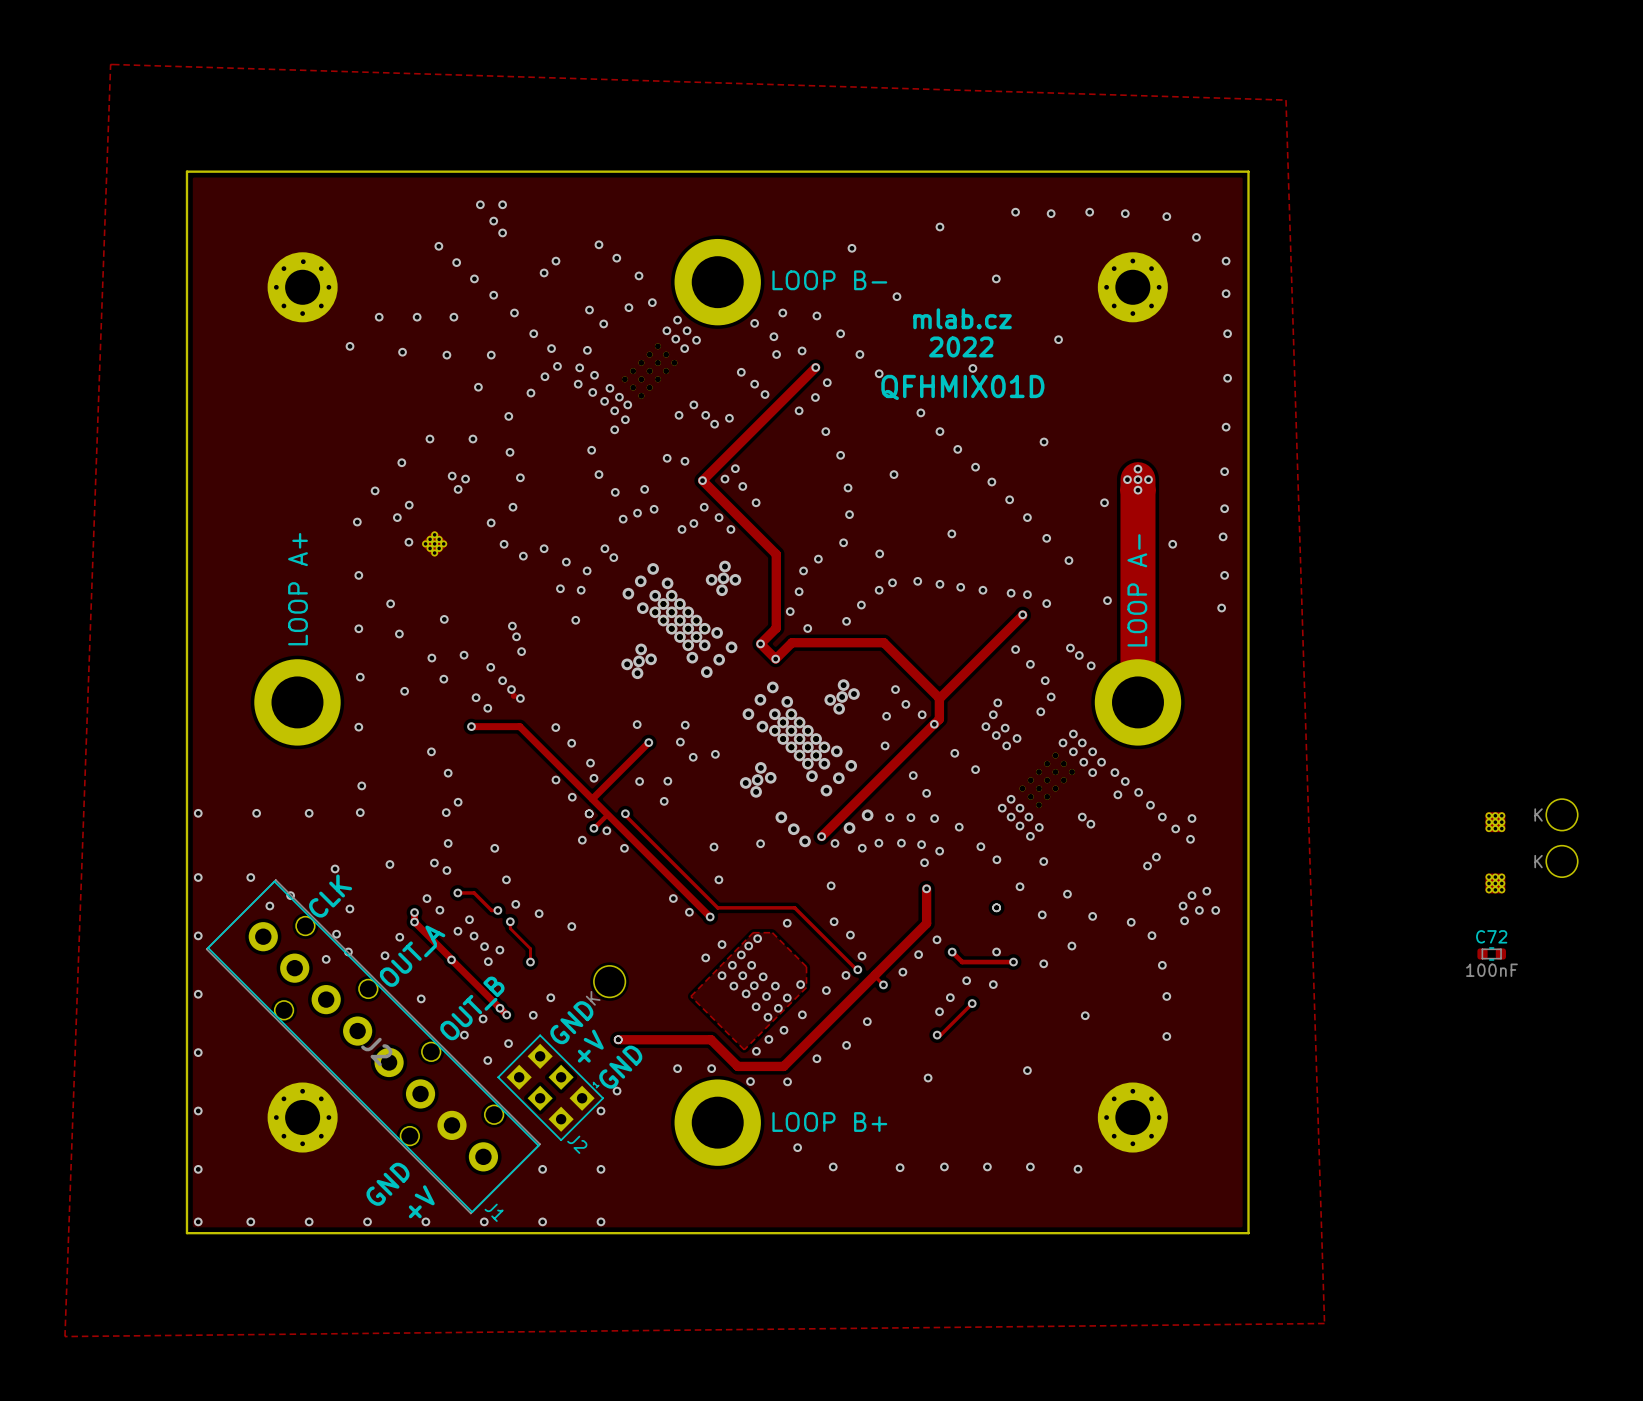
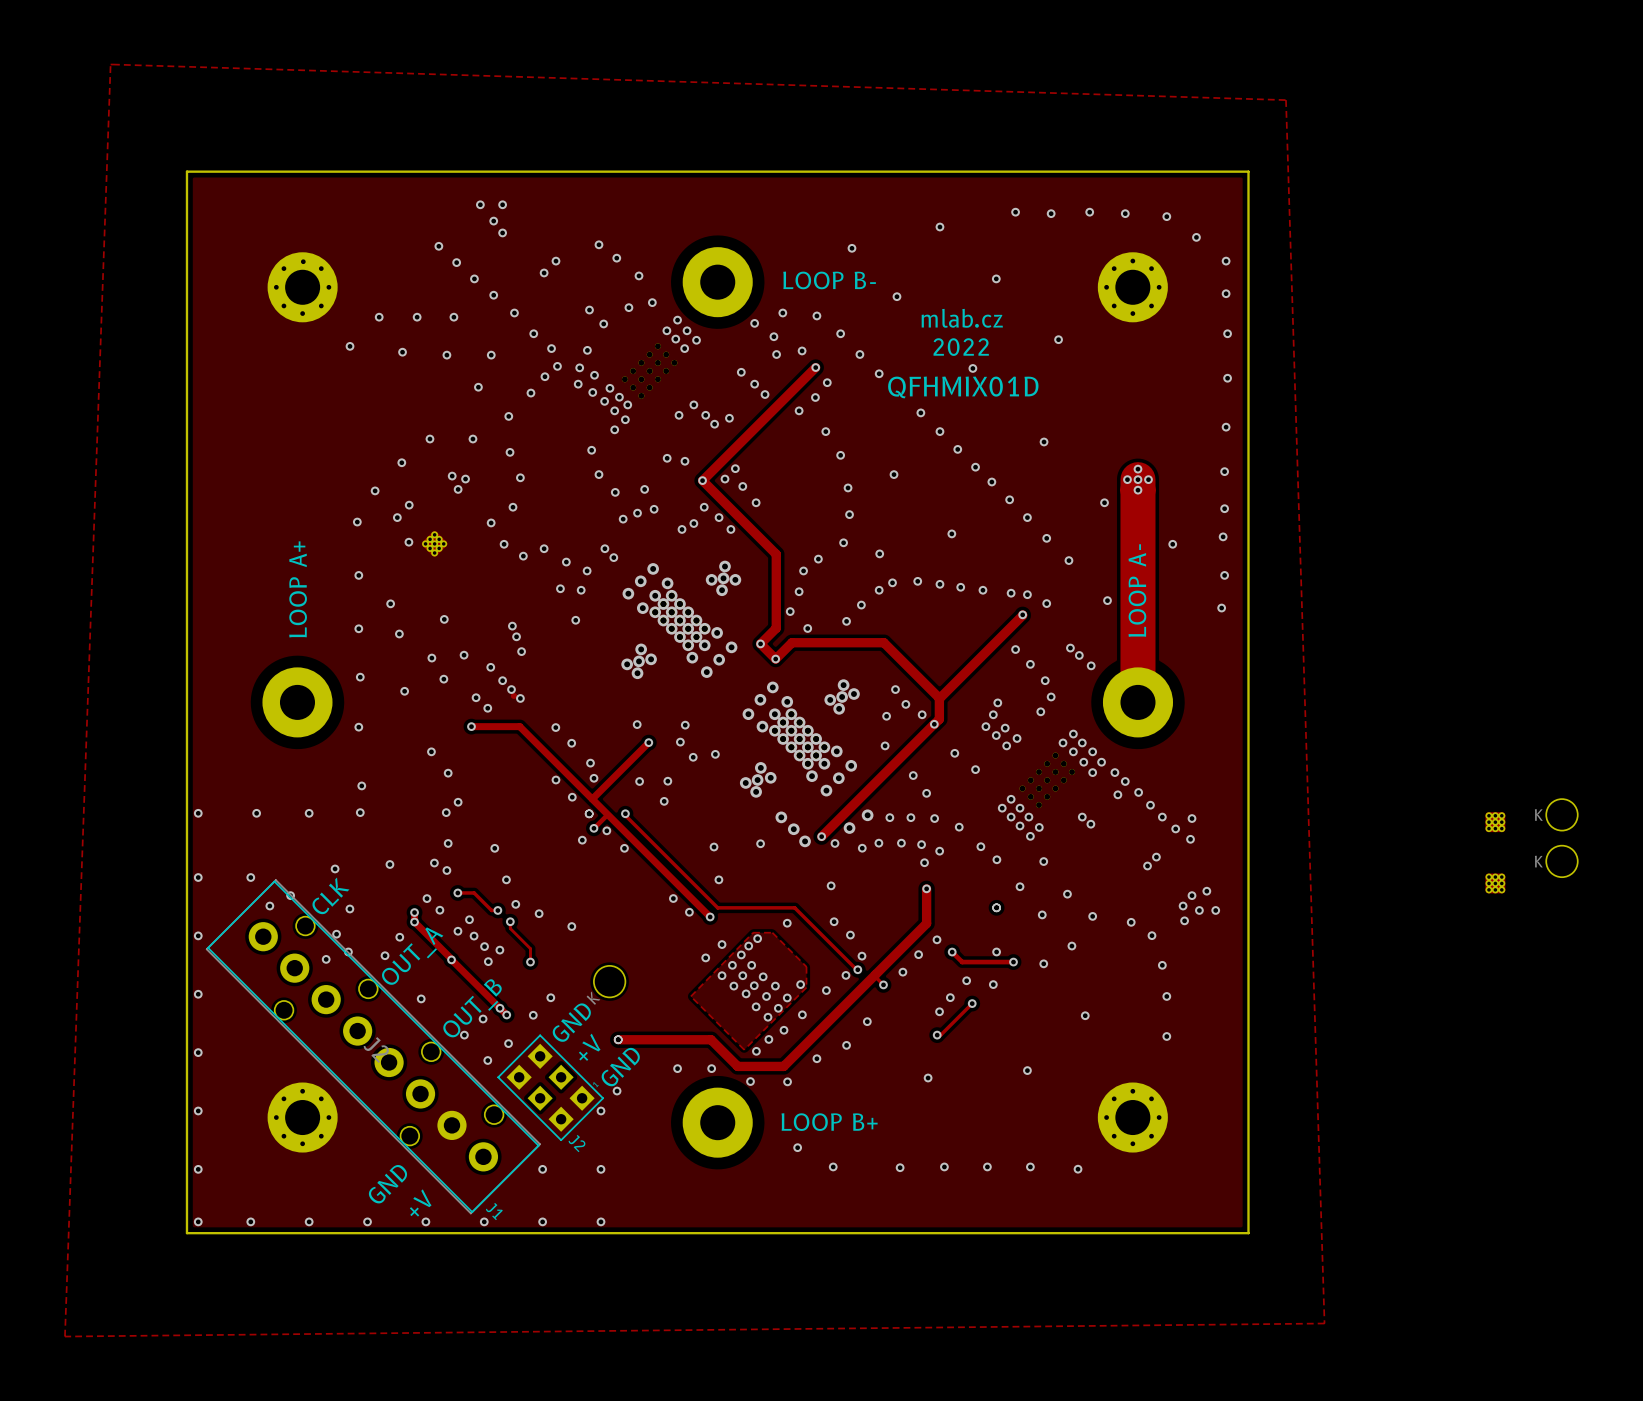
part footprint: [674, 238, 761, 326] -> [682, 247, 753, 318]
part footprint: [254, 659, 341, 746] -> [262, 667, 333, 738]
part footprint: [1094, 659, 1182, 746] -> [1102, 667, 1174, 738]
C72: 100nF (1491, 953) -> none
part footprint: [674, 1079, 761, 1166] -> [682, 1087, 753, 1158]

